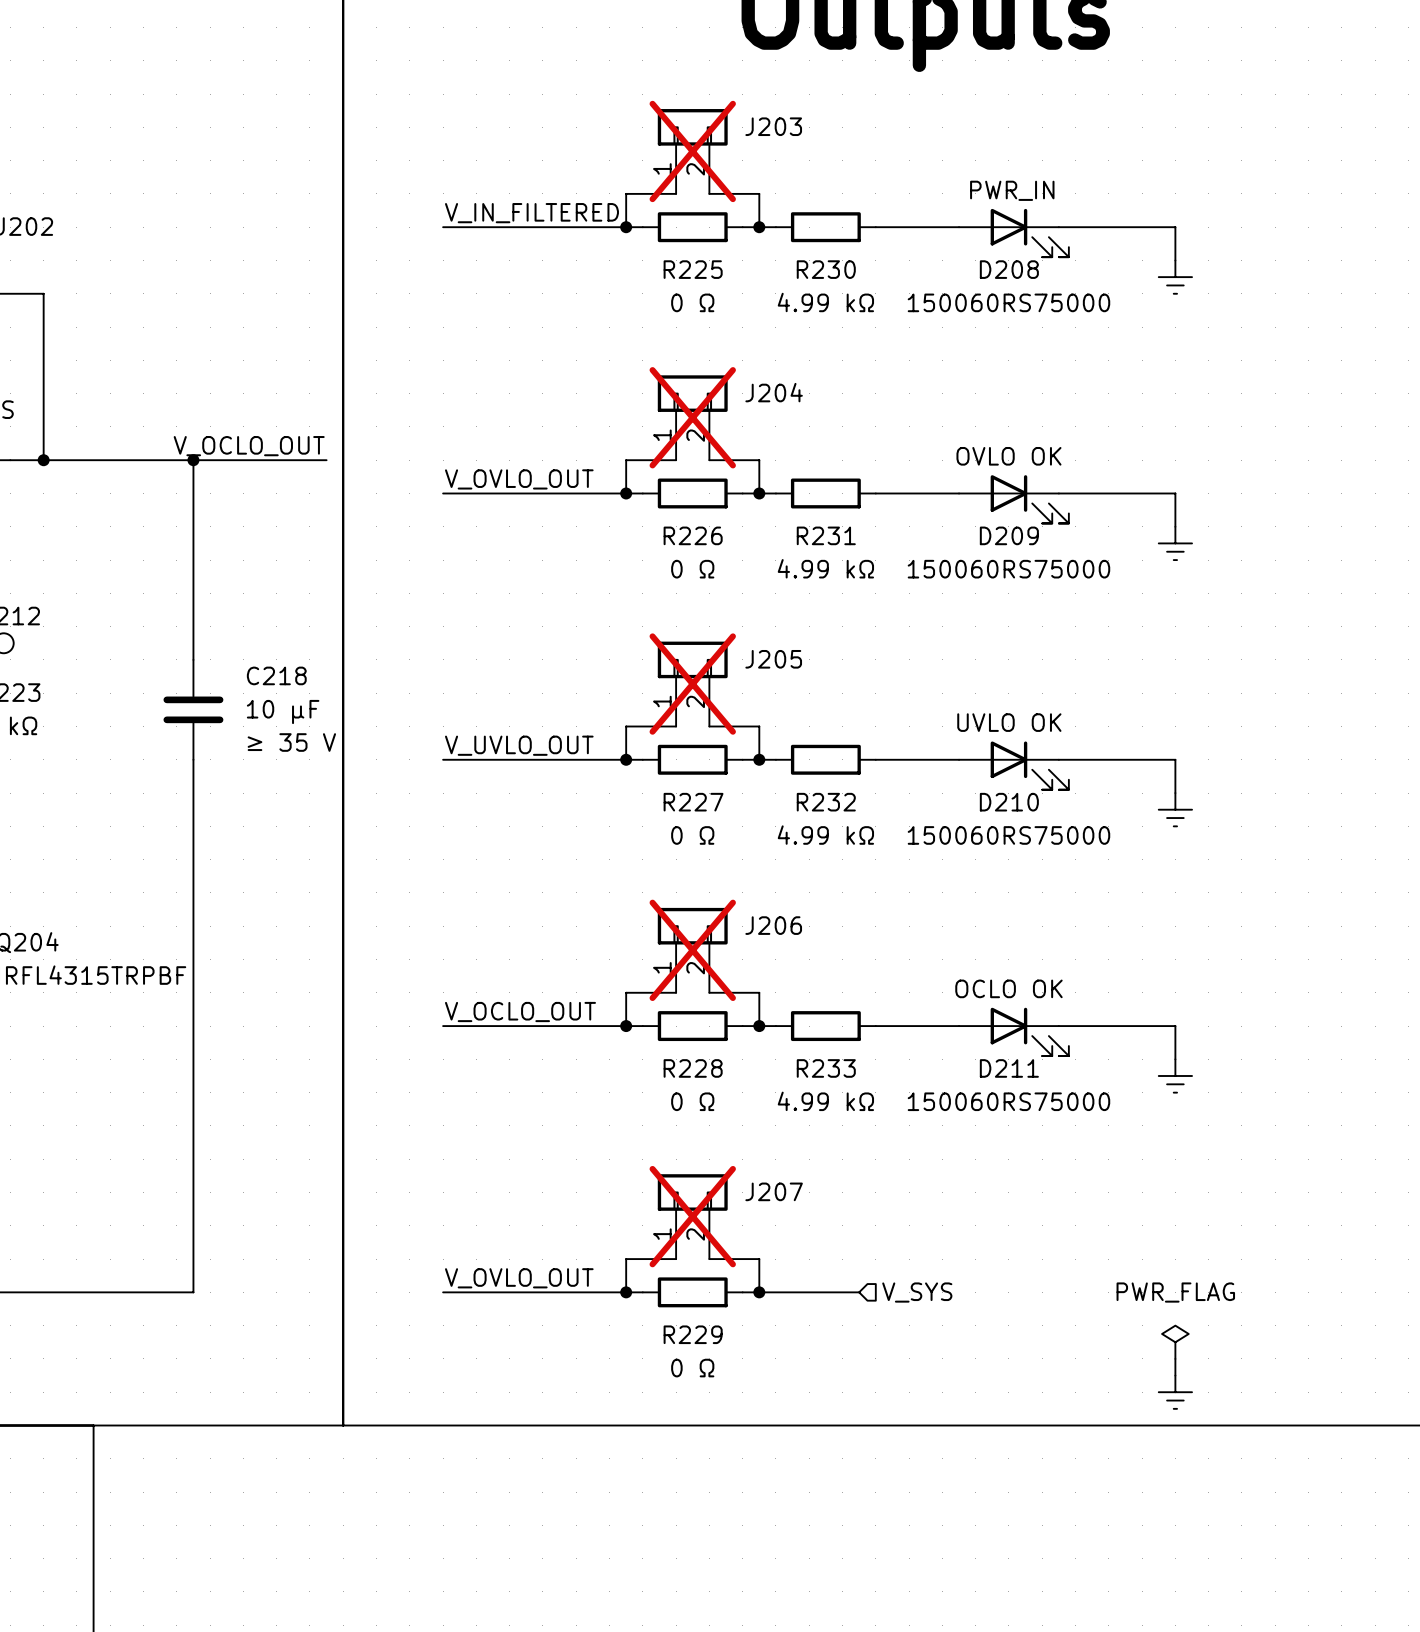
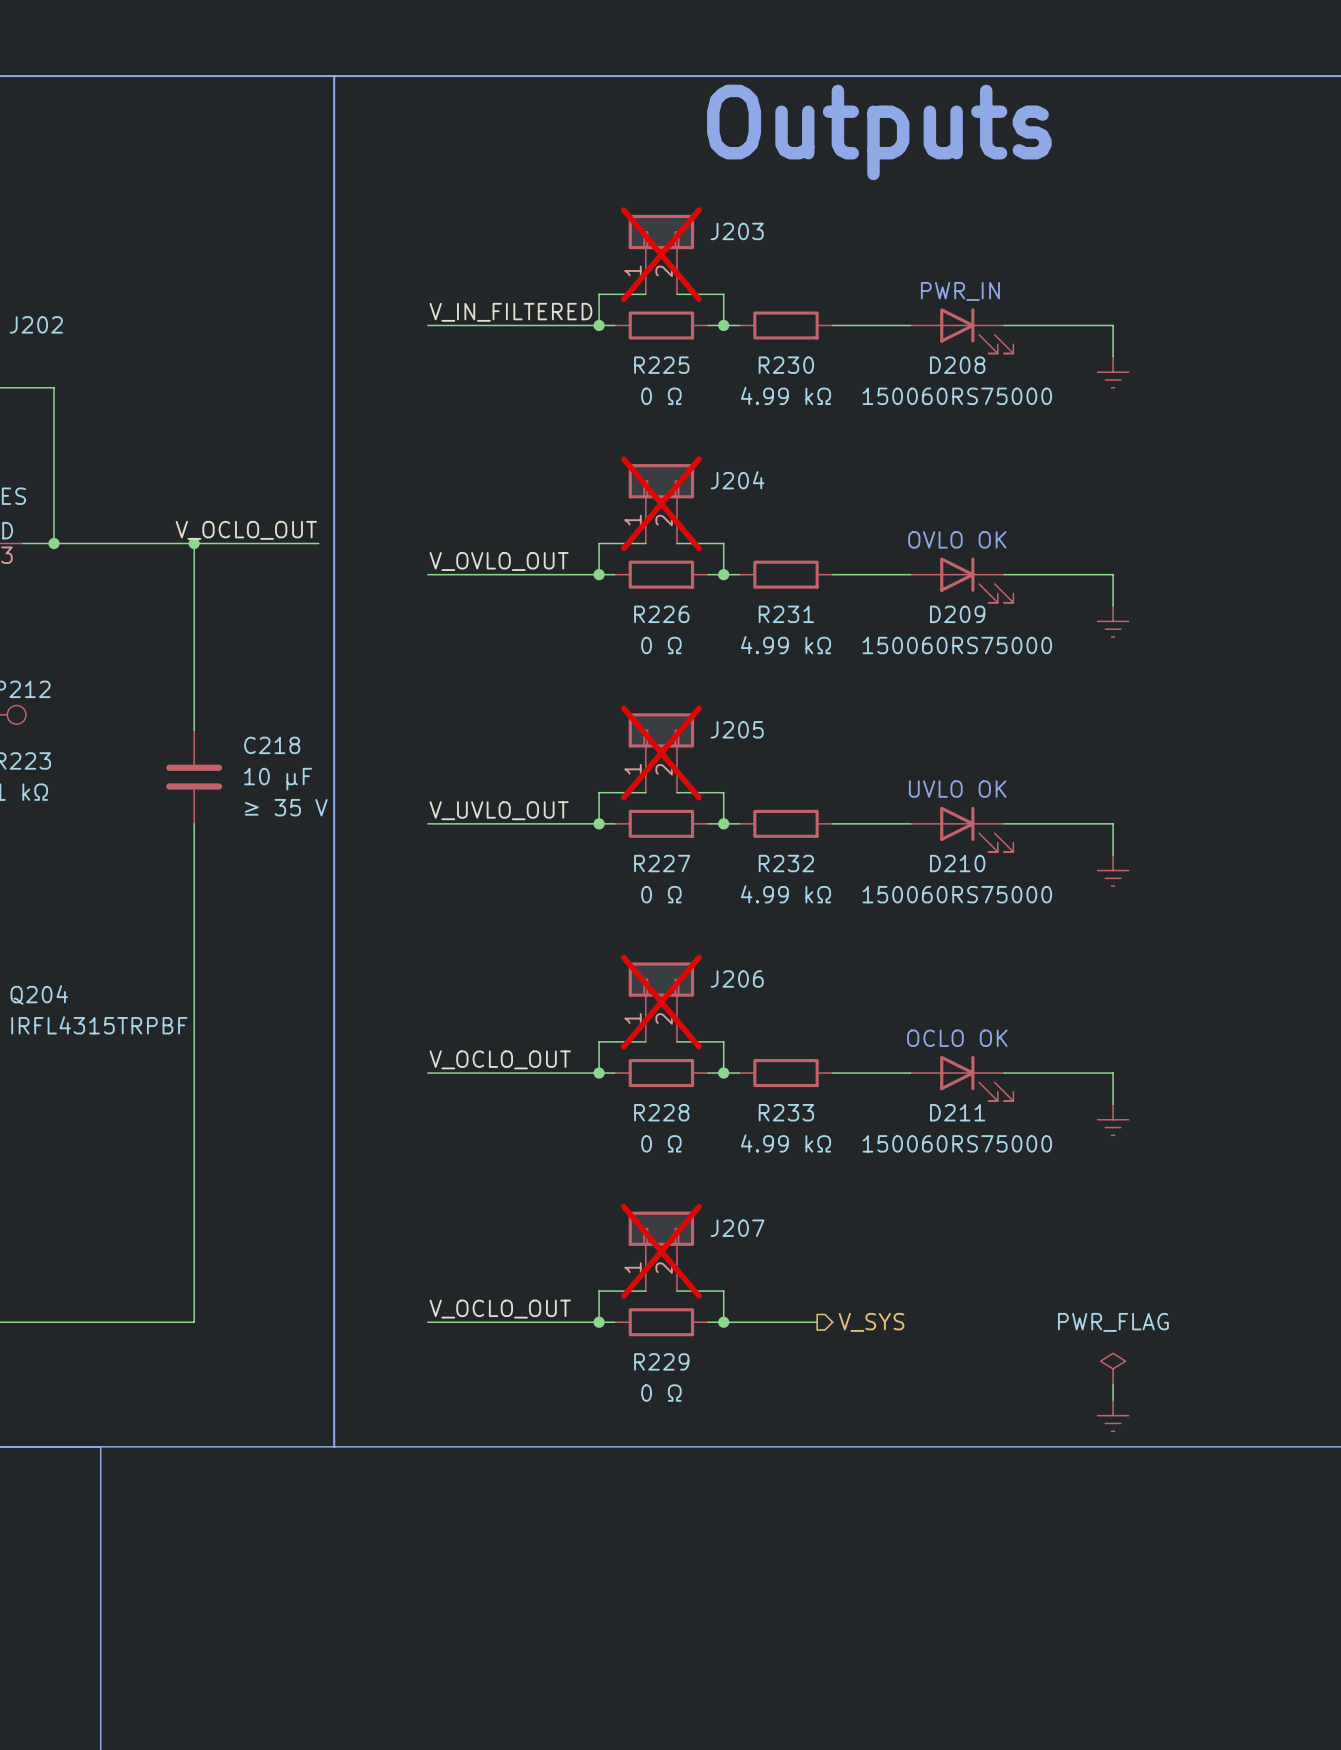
label: V_OVLO_OUT (519, 1278) -> V_OCLO_OUT (500, 1309)
hierarchical label shape: input (917, 1292) -> output (871, 1322)

